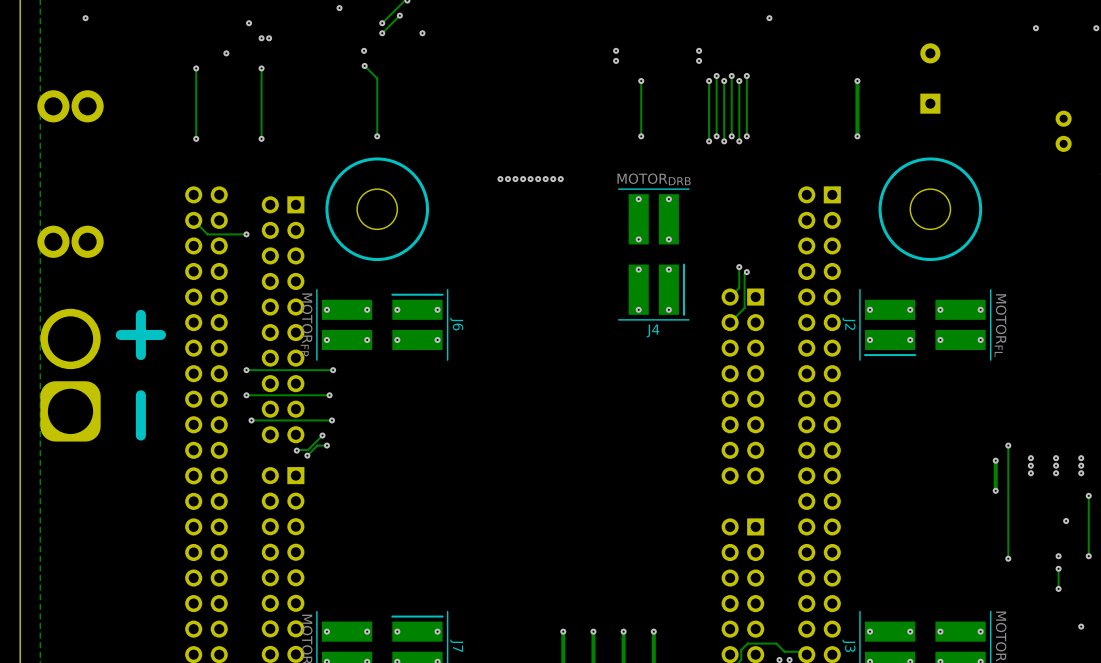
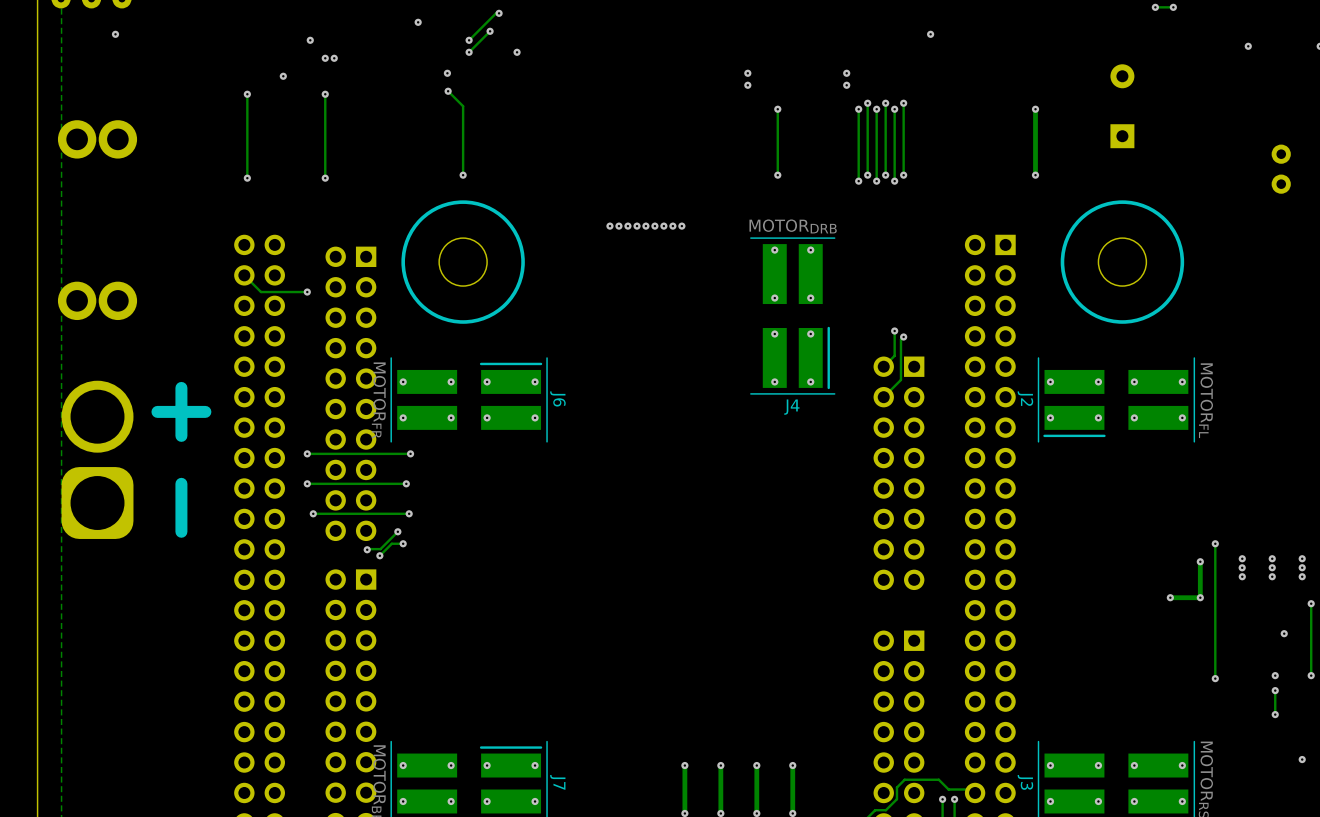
via: none -> (1170, 597)
track: none -> (1200, 597) (1170, 597)

